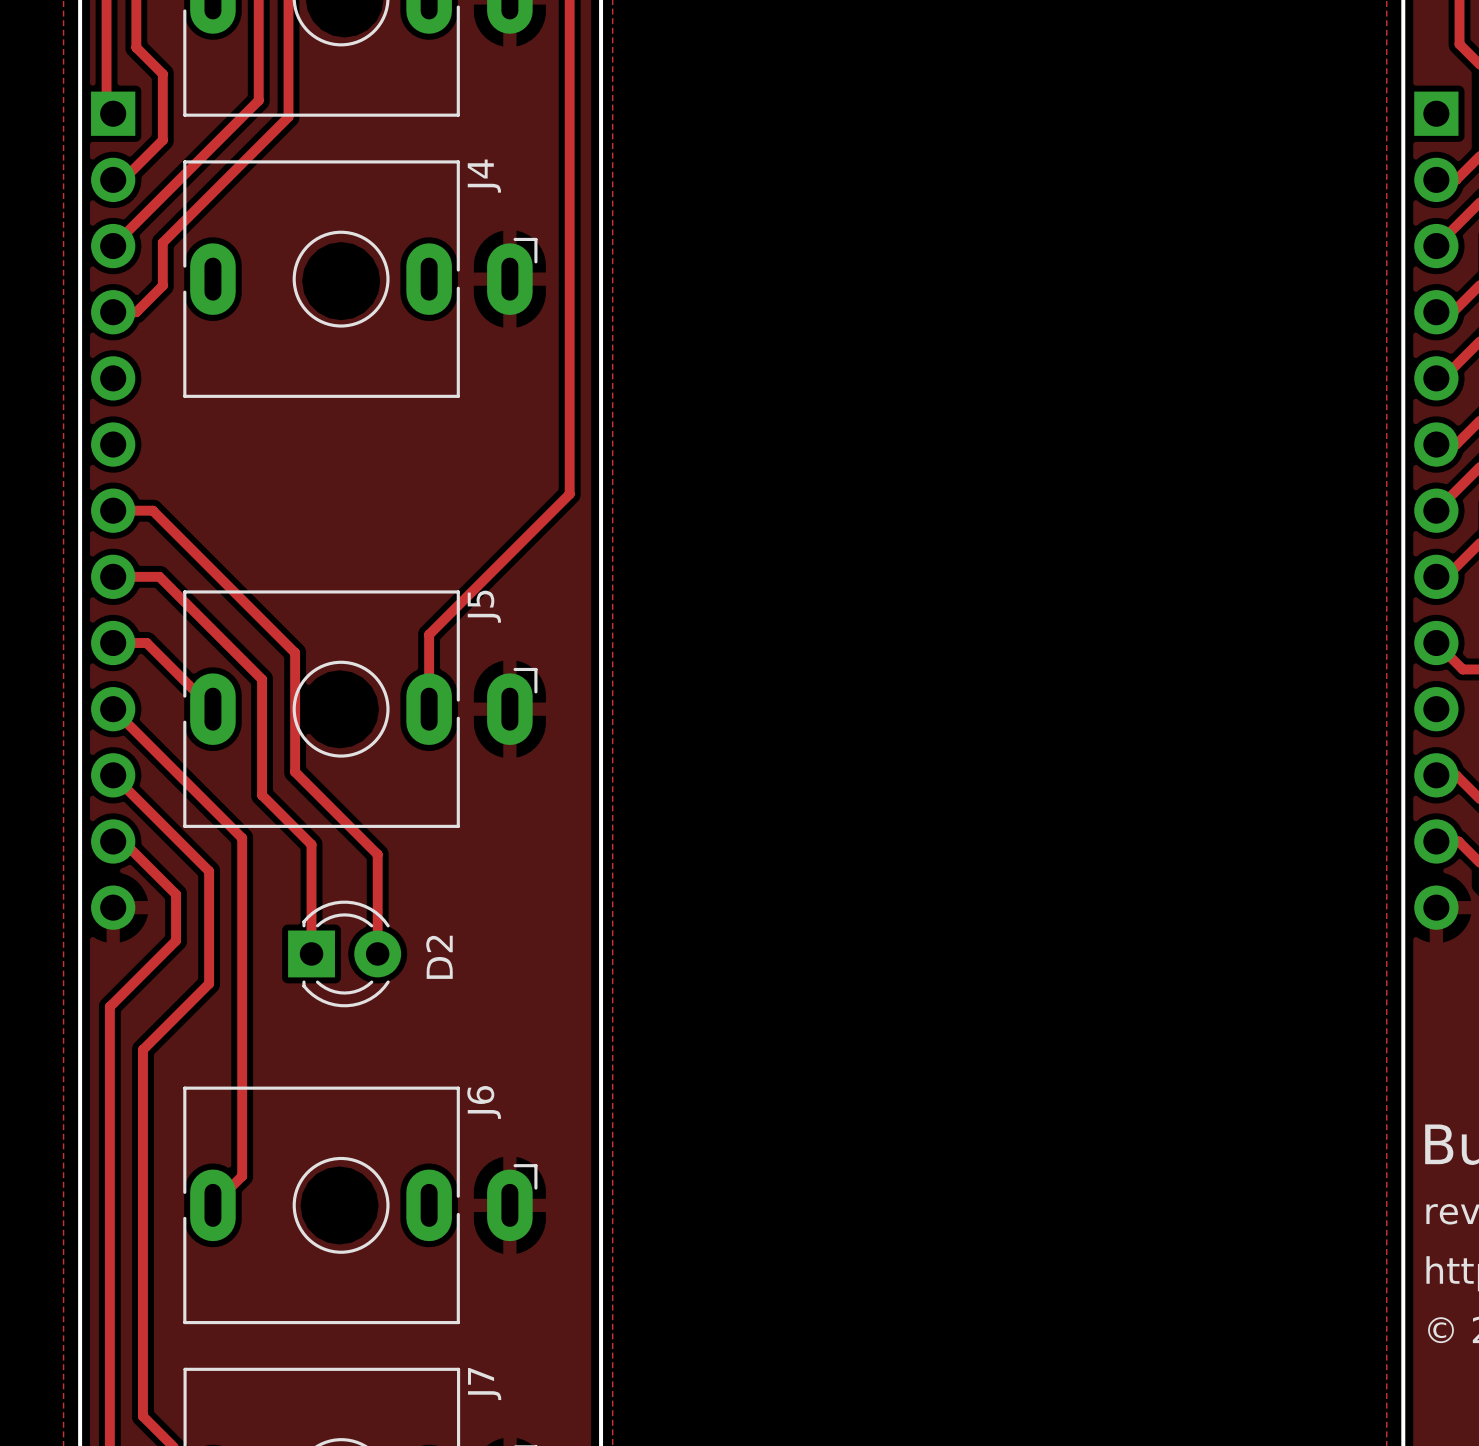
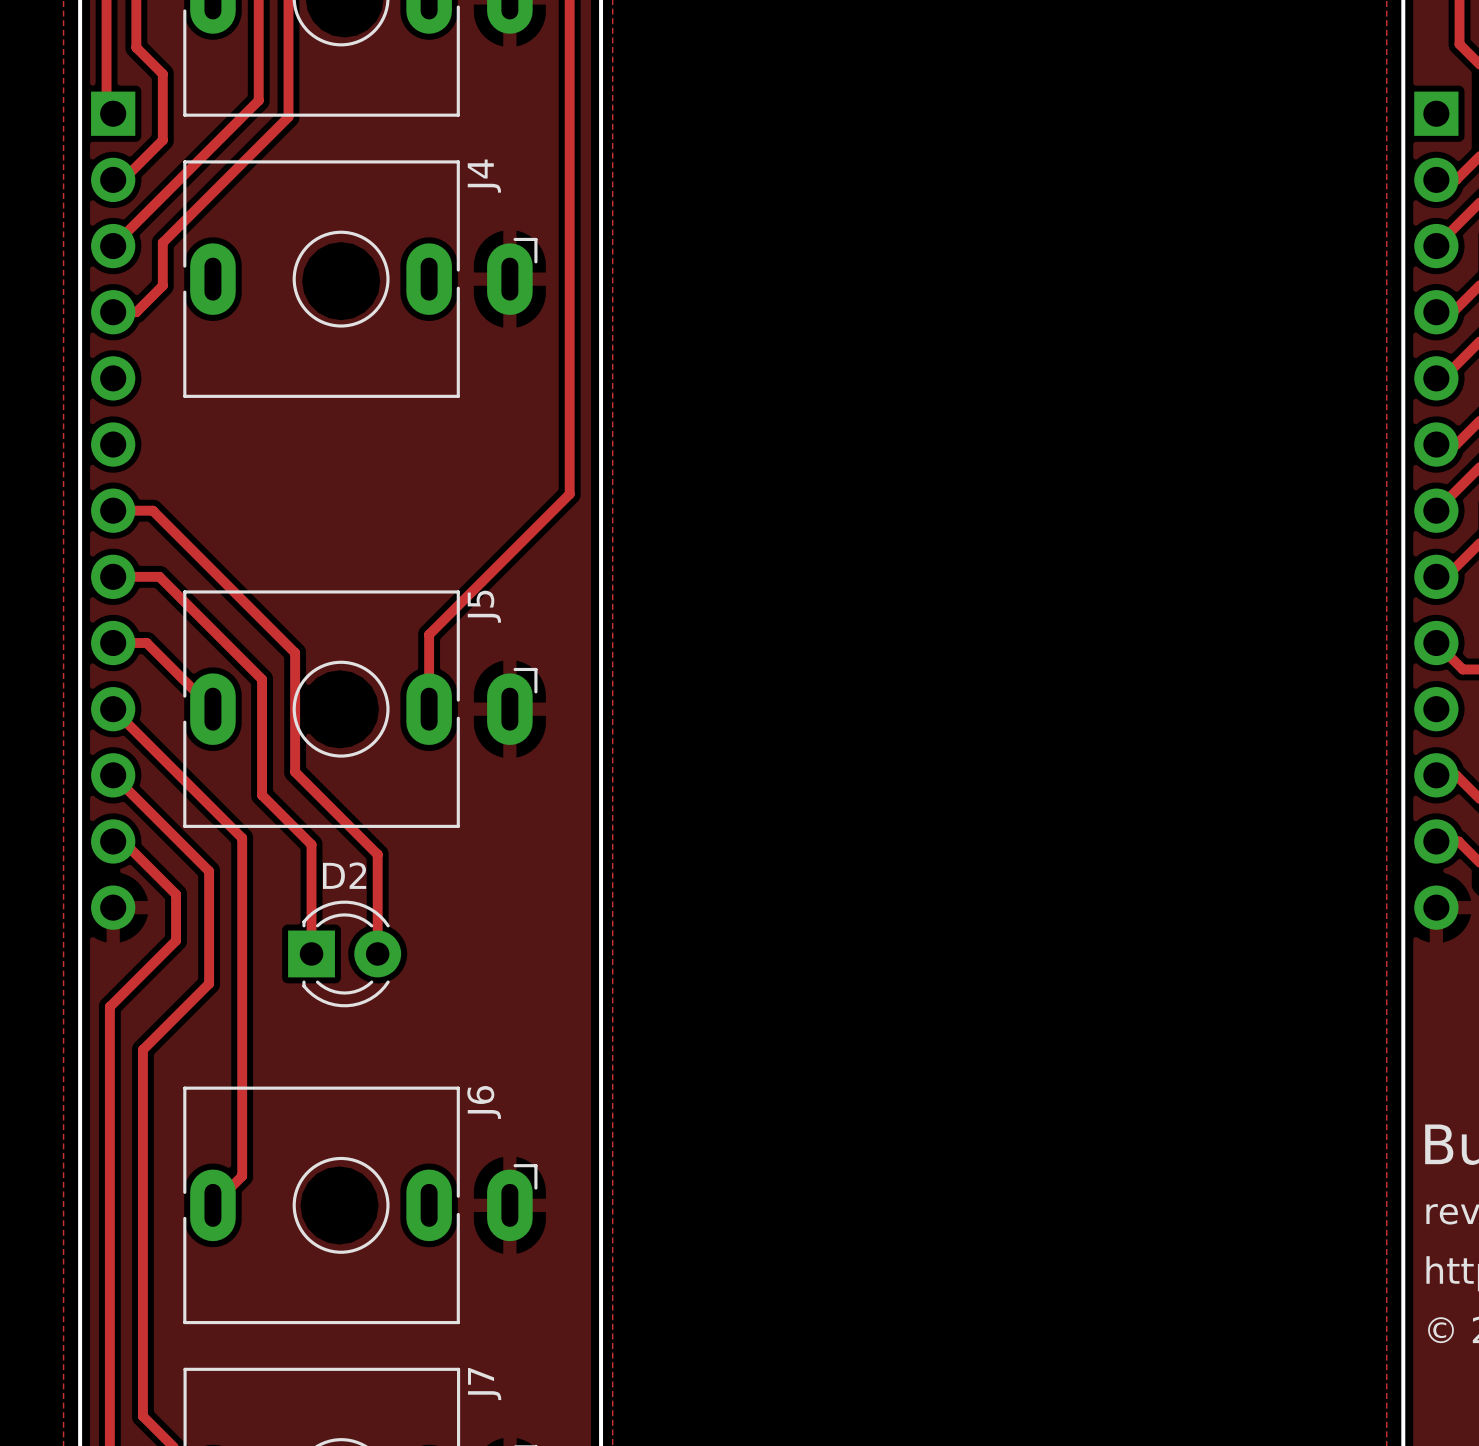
D2 name rotation: 0° (439, 957) -> 90° clockwise (344, 875)
D2 name position: D2 (439, 957) -> D2 (344, 875)

